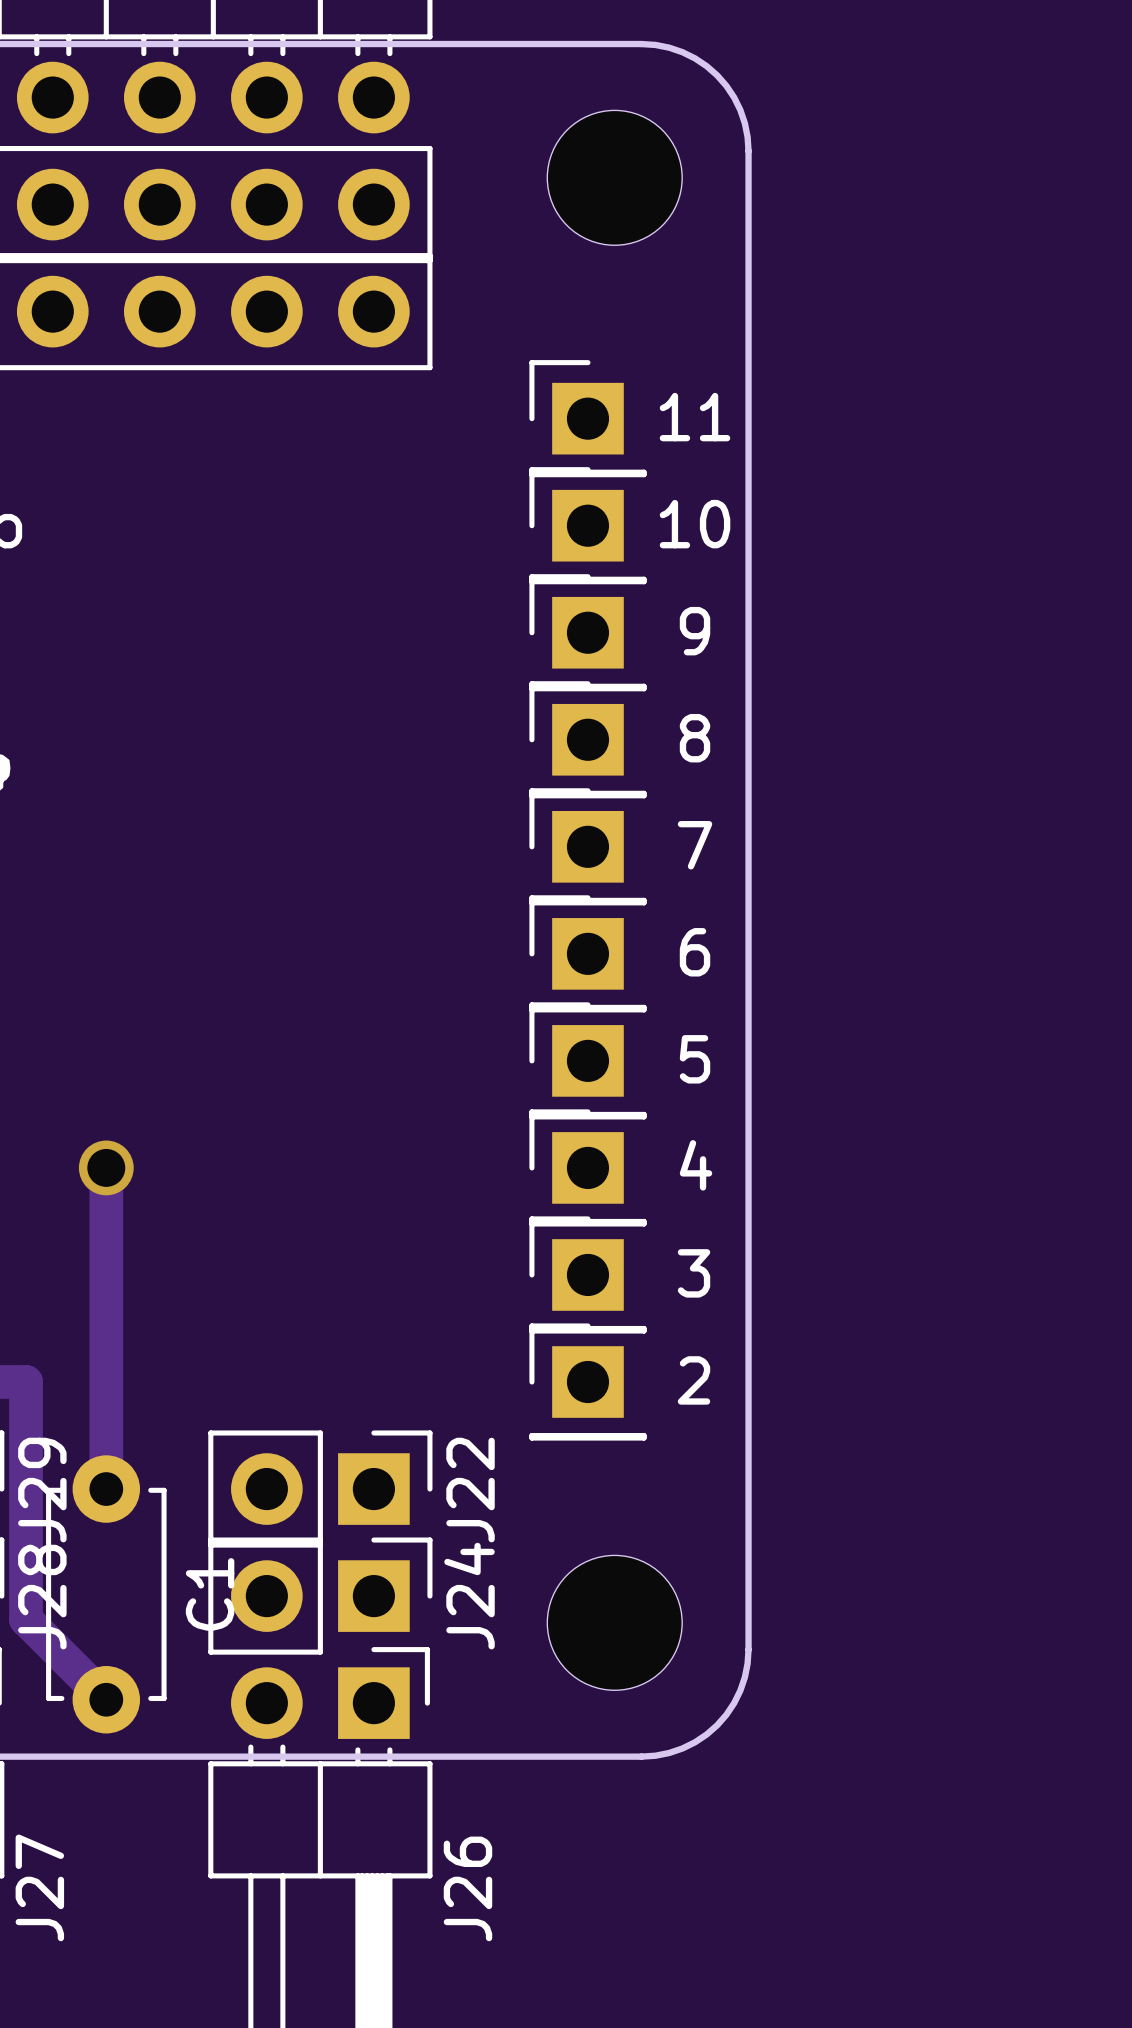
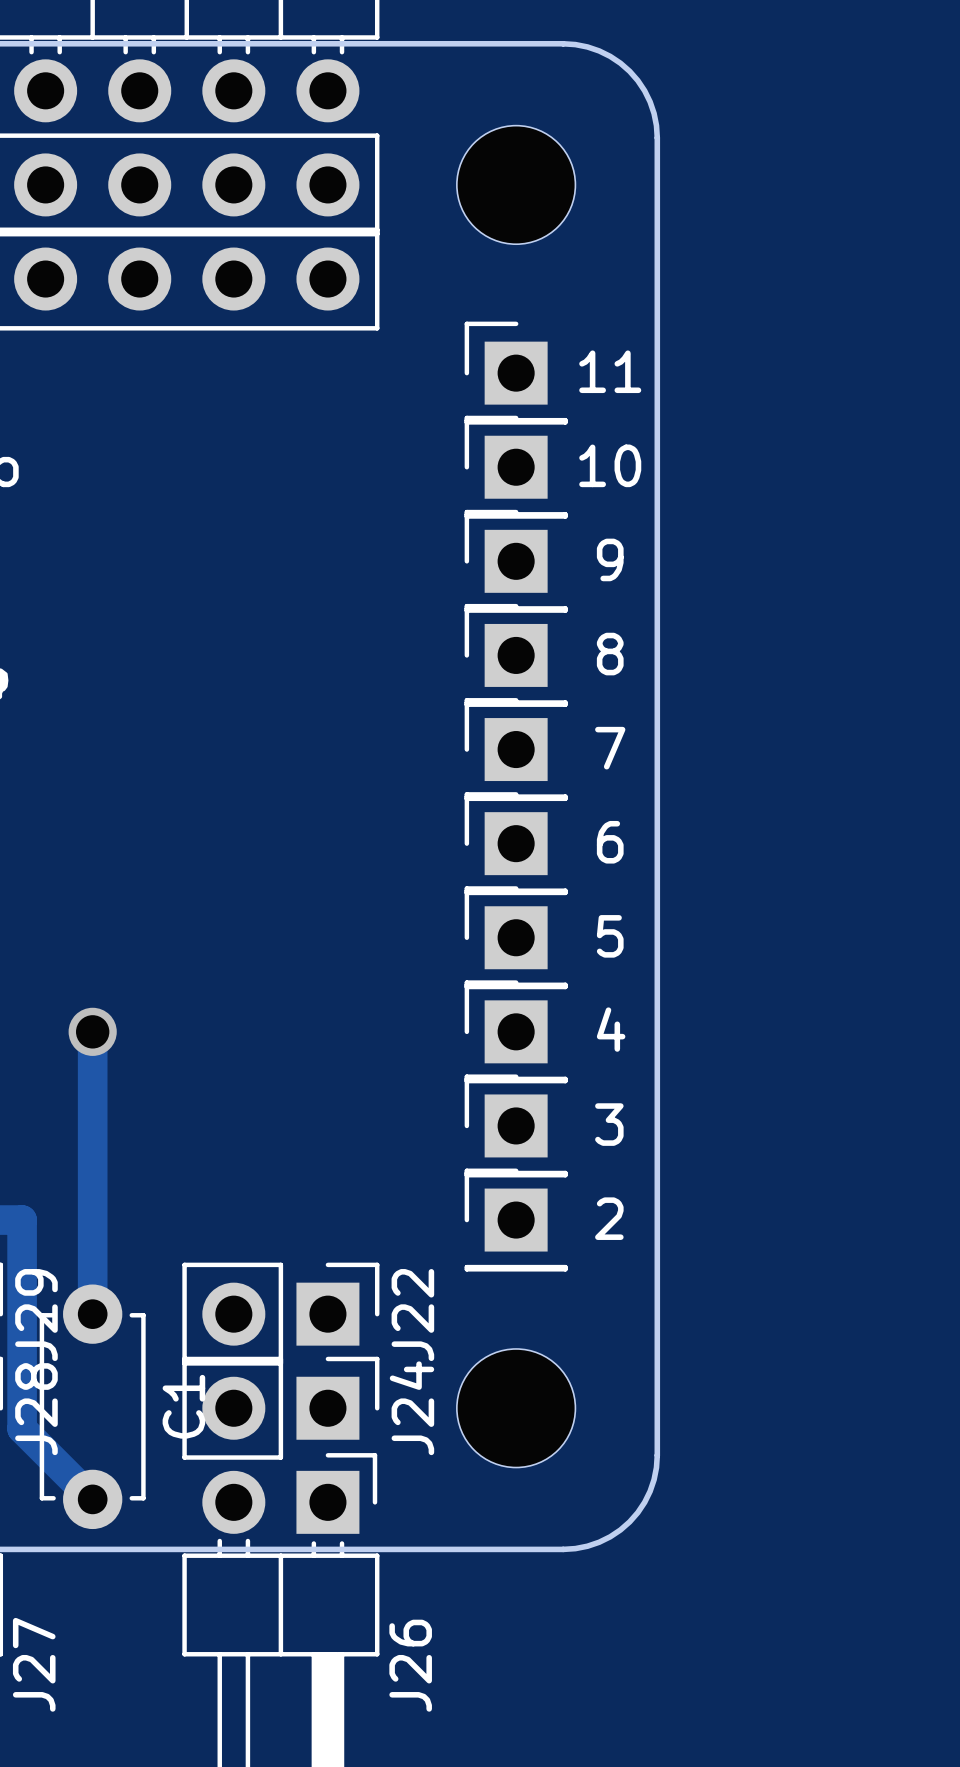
part position: (614, 177) -> (516, 184)
part position: (614, 1622) -> (516, 1408)

